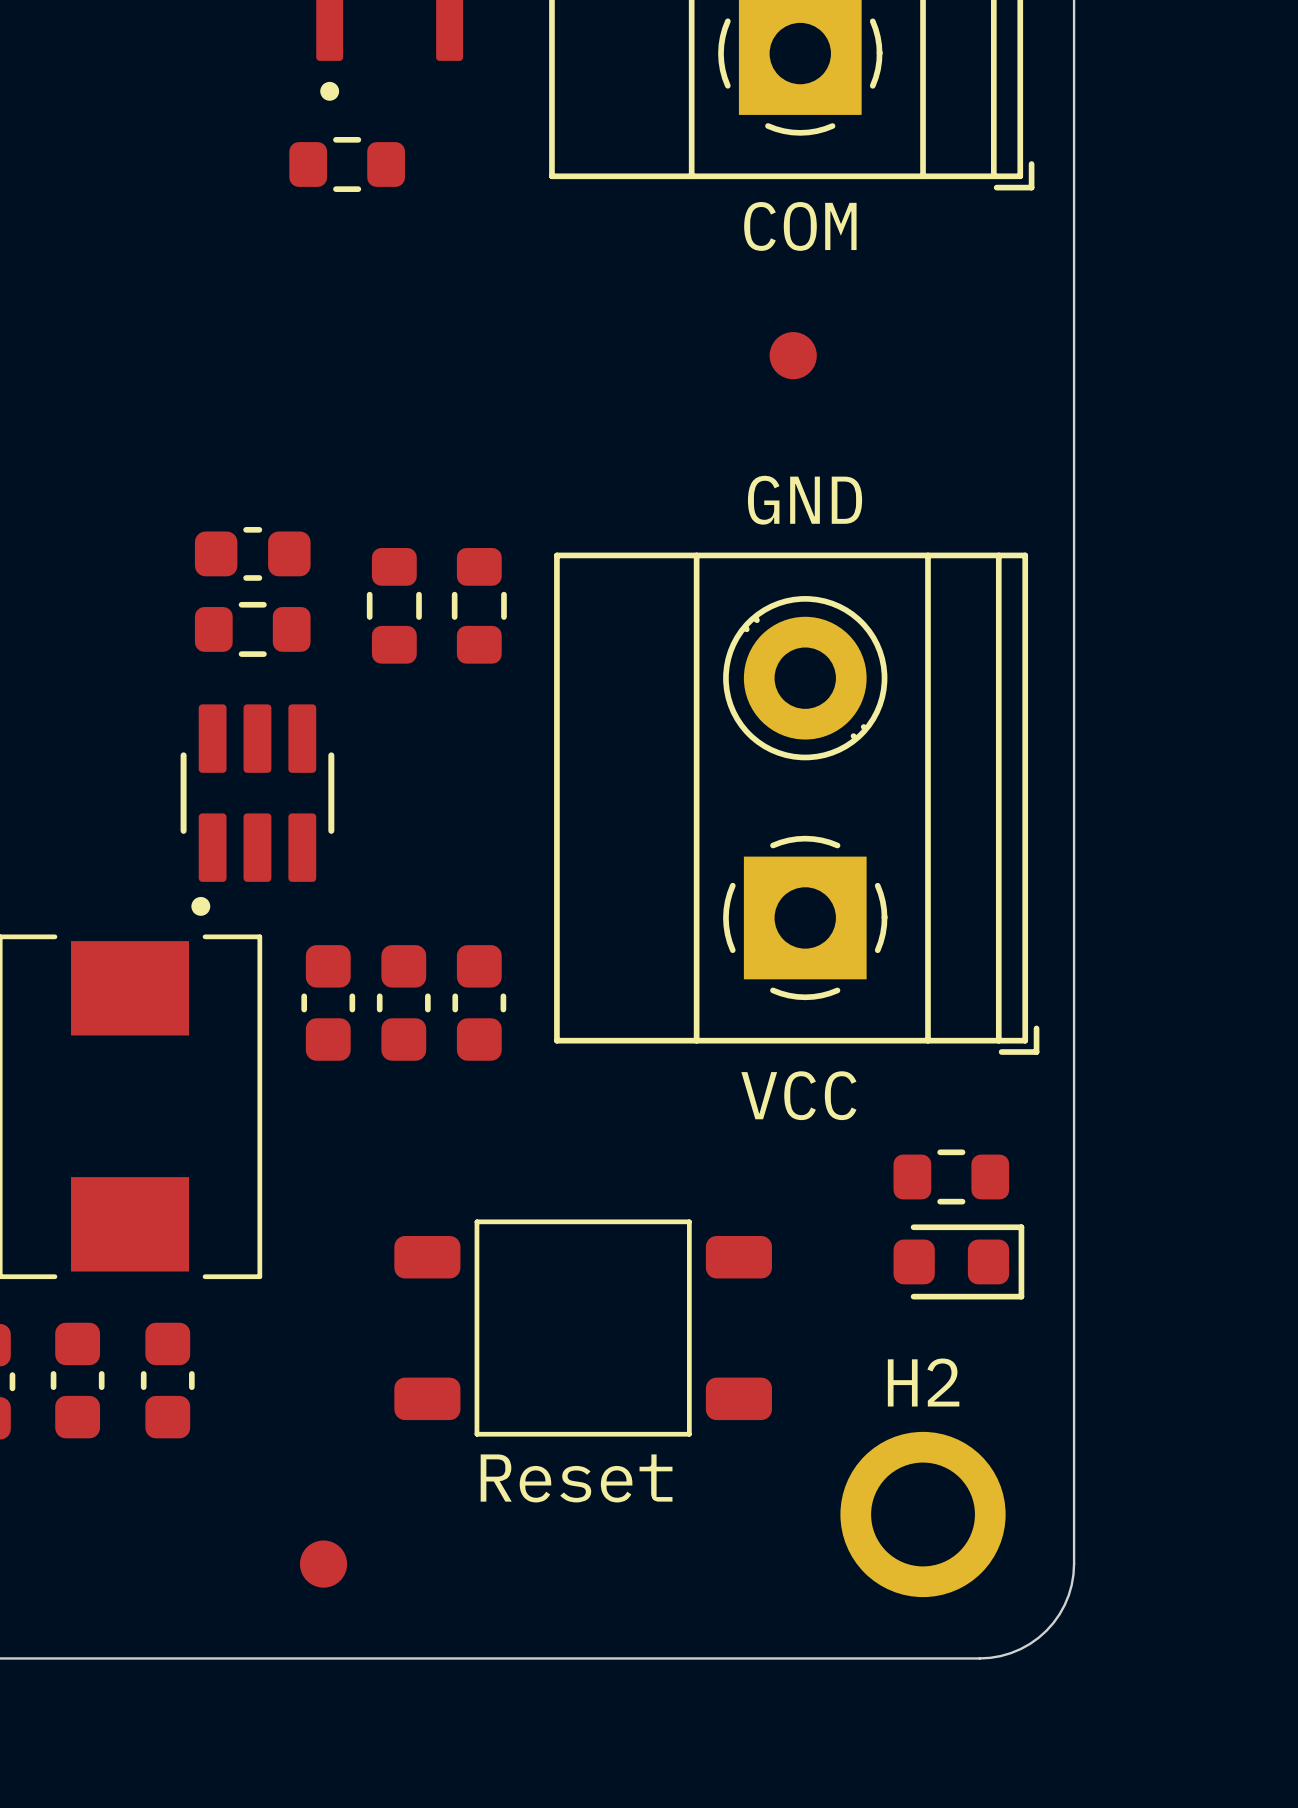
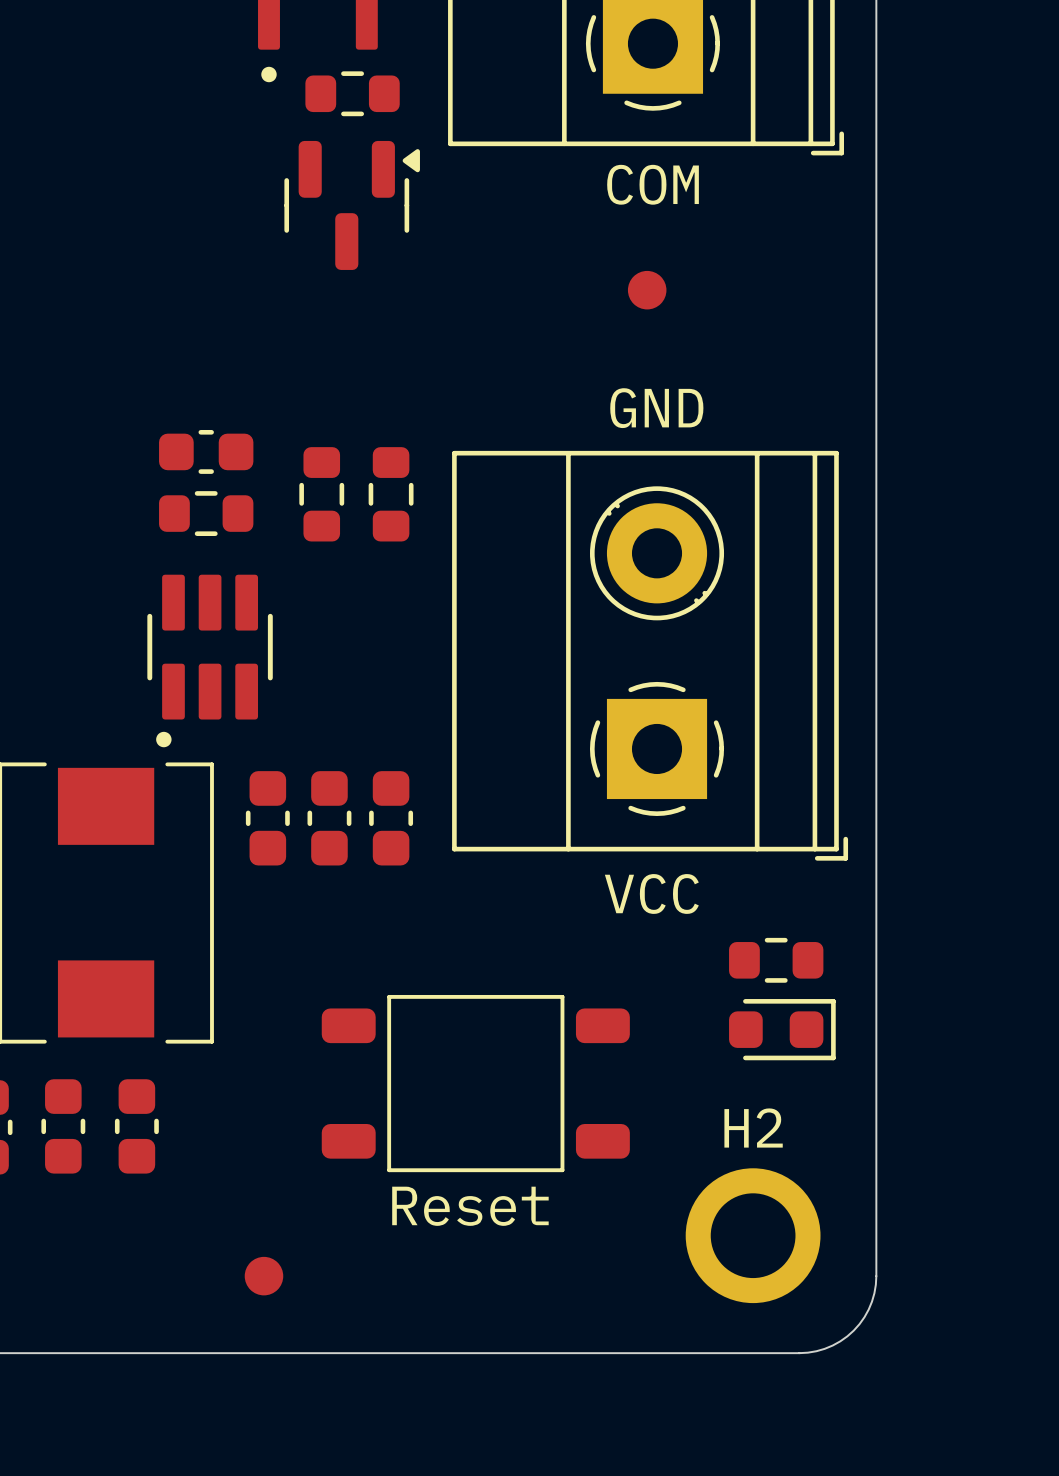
part position: (347, 164) -> (352, 93)
part: none -> (352, 205)

